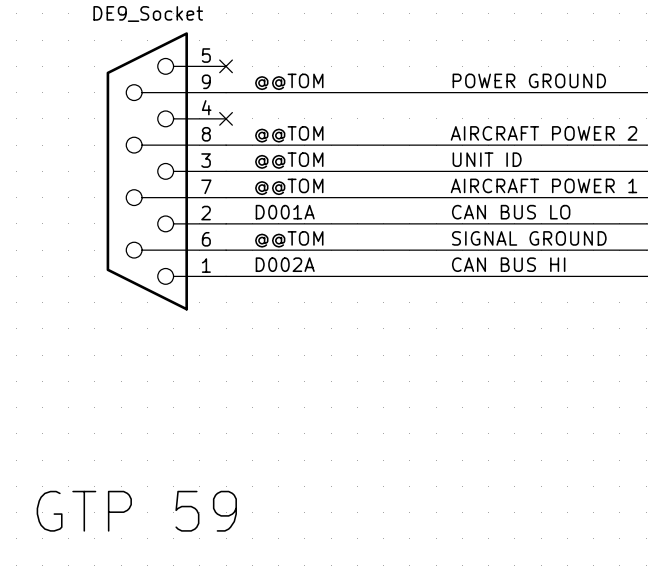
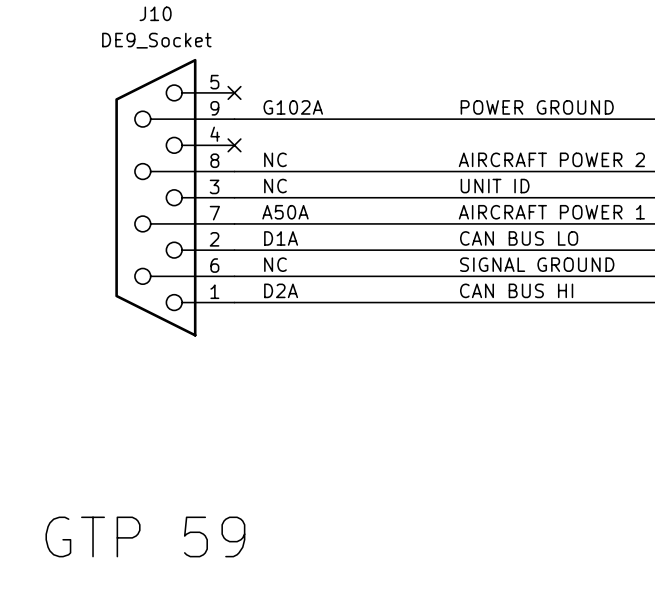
label: @@TOM (289, 81) -> G102A (293, 107)
label: @@TOM (289, 134) -> NC (275, 159)
label: @@TOM (289, 160) -> NC (275, 186)
label: @@TOM (289, 186) -> A50A (285, 212)
label: D001A (285, 212) -> D1A (281, 238)
label: @@TOM (289, 239) -> NC (275, 264)
label: D002A (285, 264) -> D2A (281, 290)

